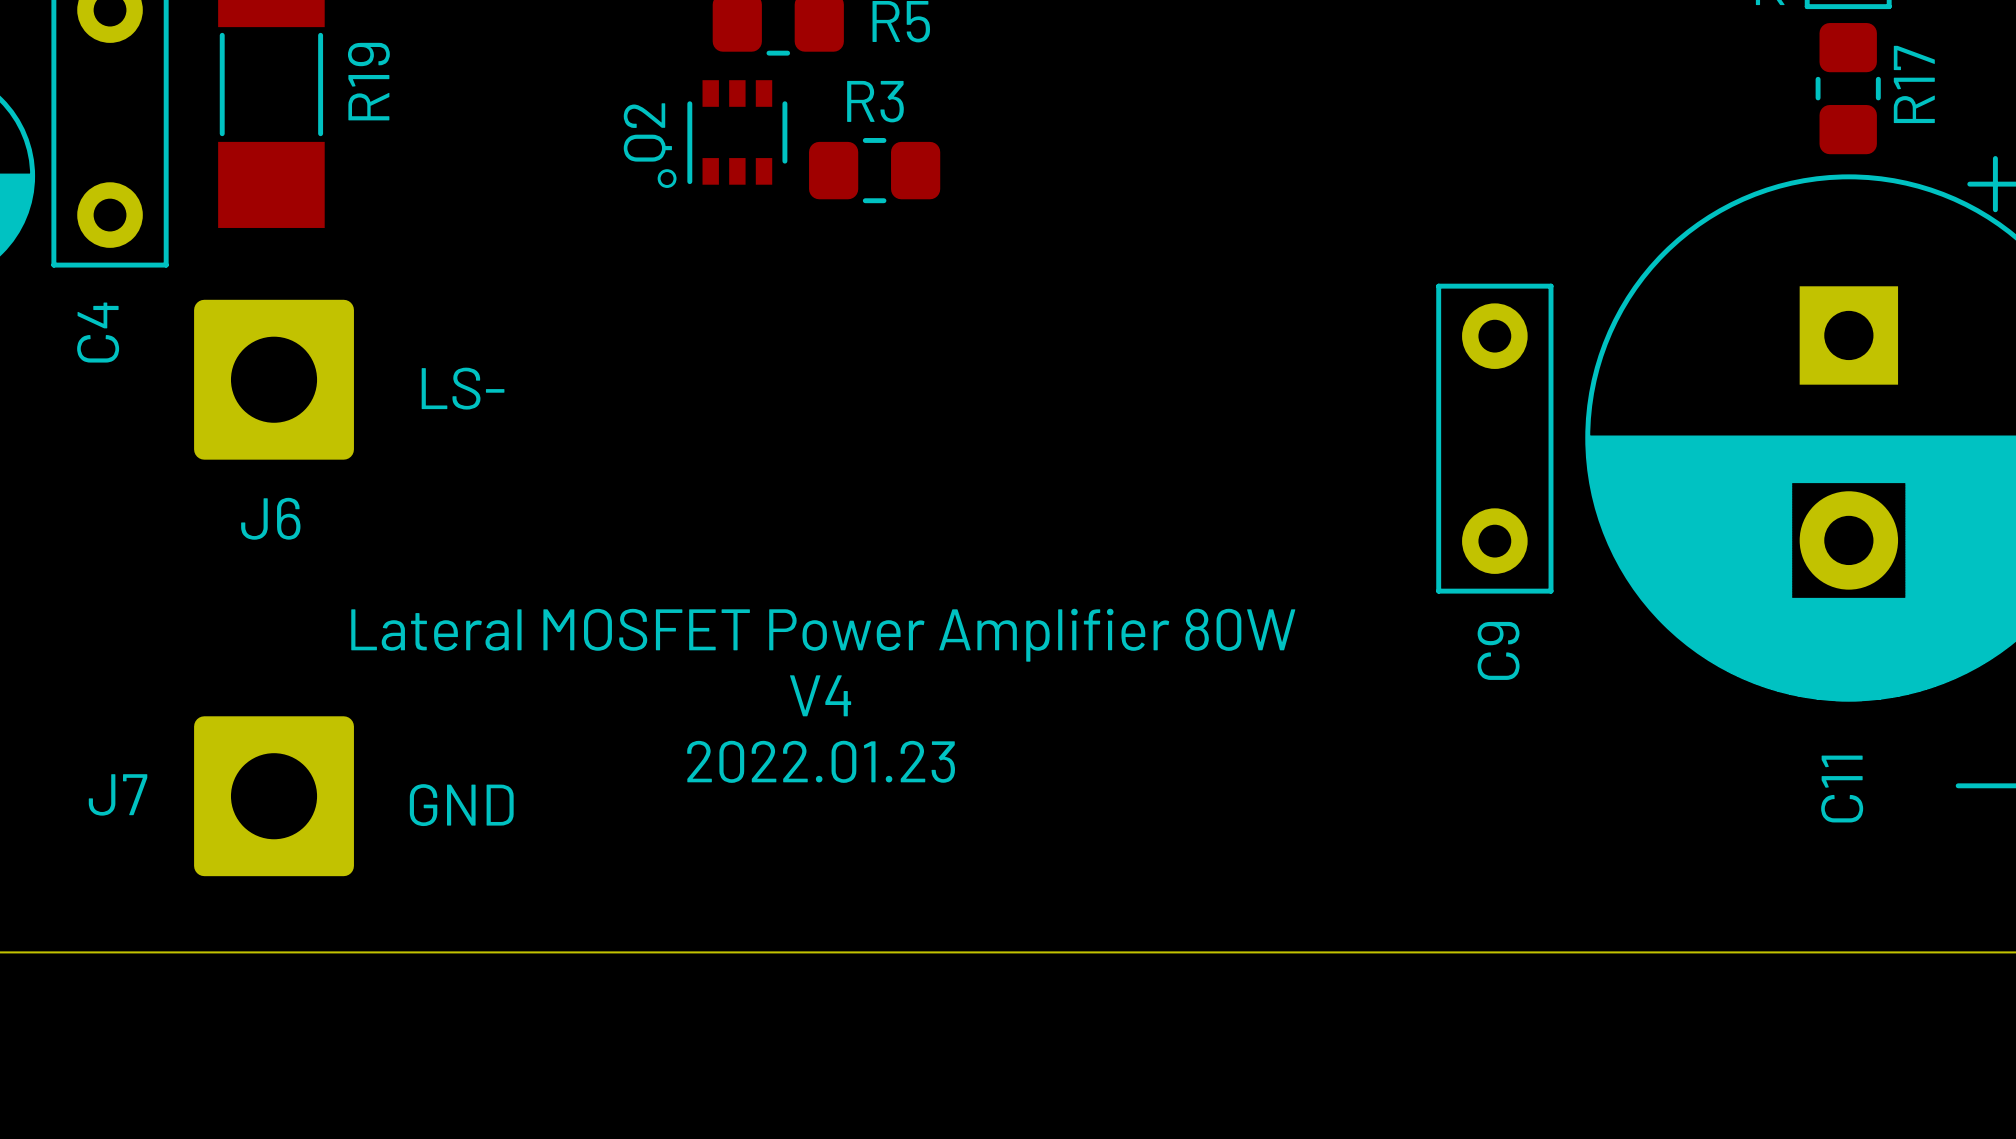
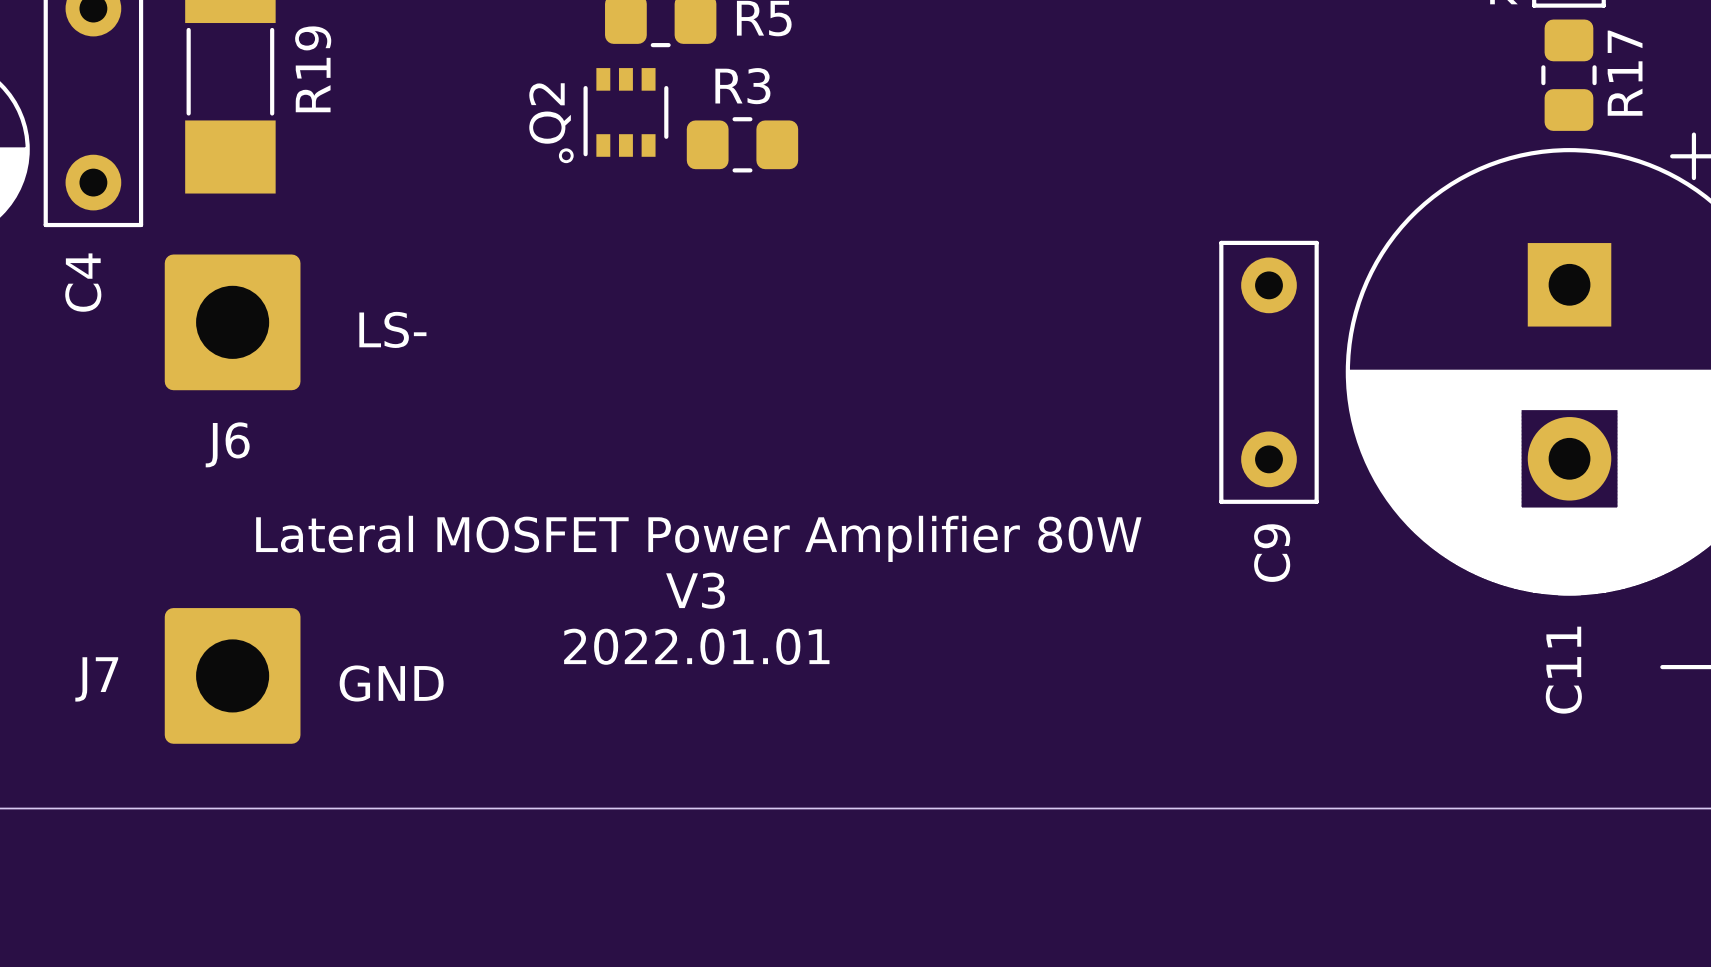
text: V4 (820, 695) -> V3 (695, 590)
text: 2022.01.23 (821, 761) -> 2022.01.01 (696, 646)

